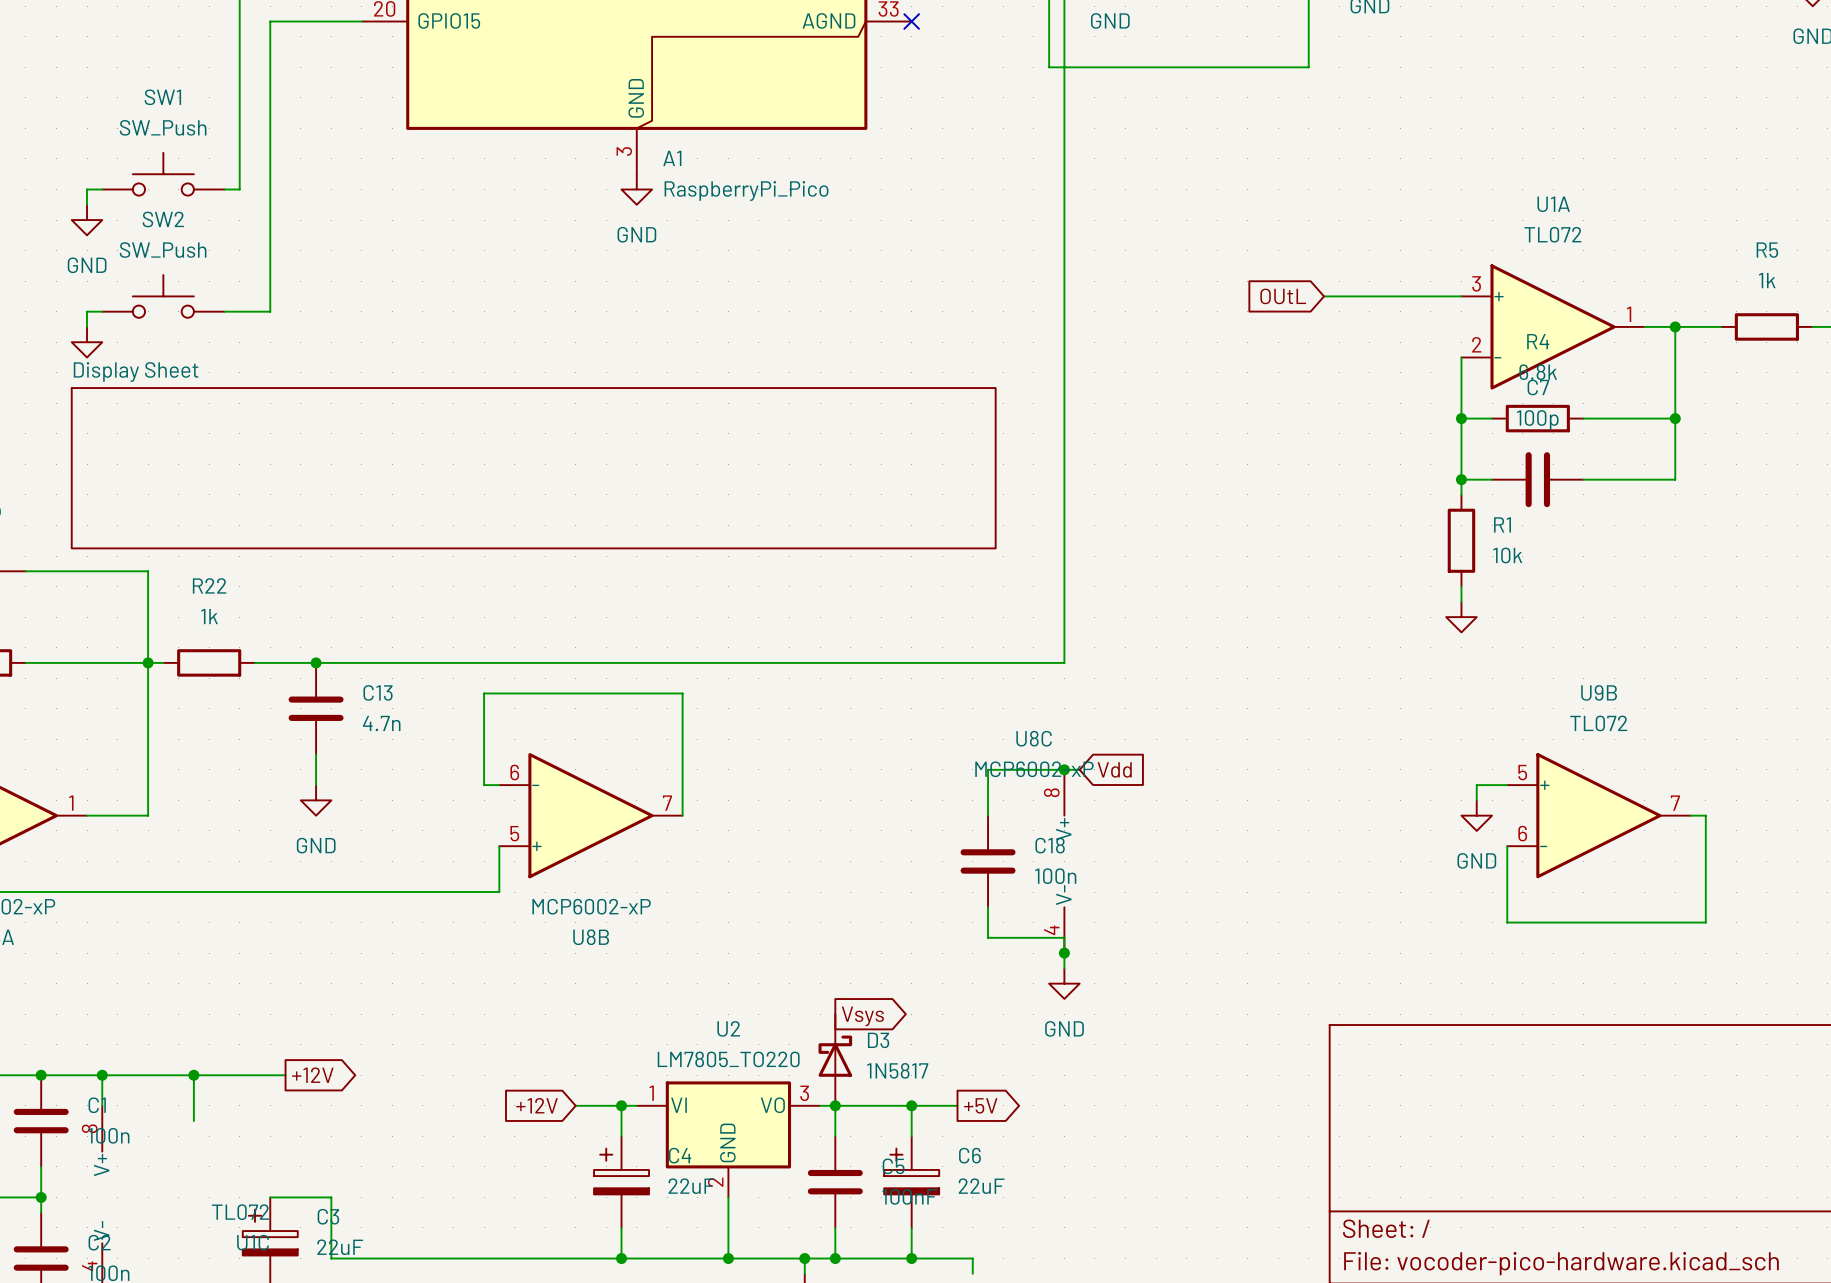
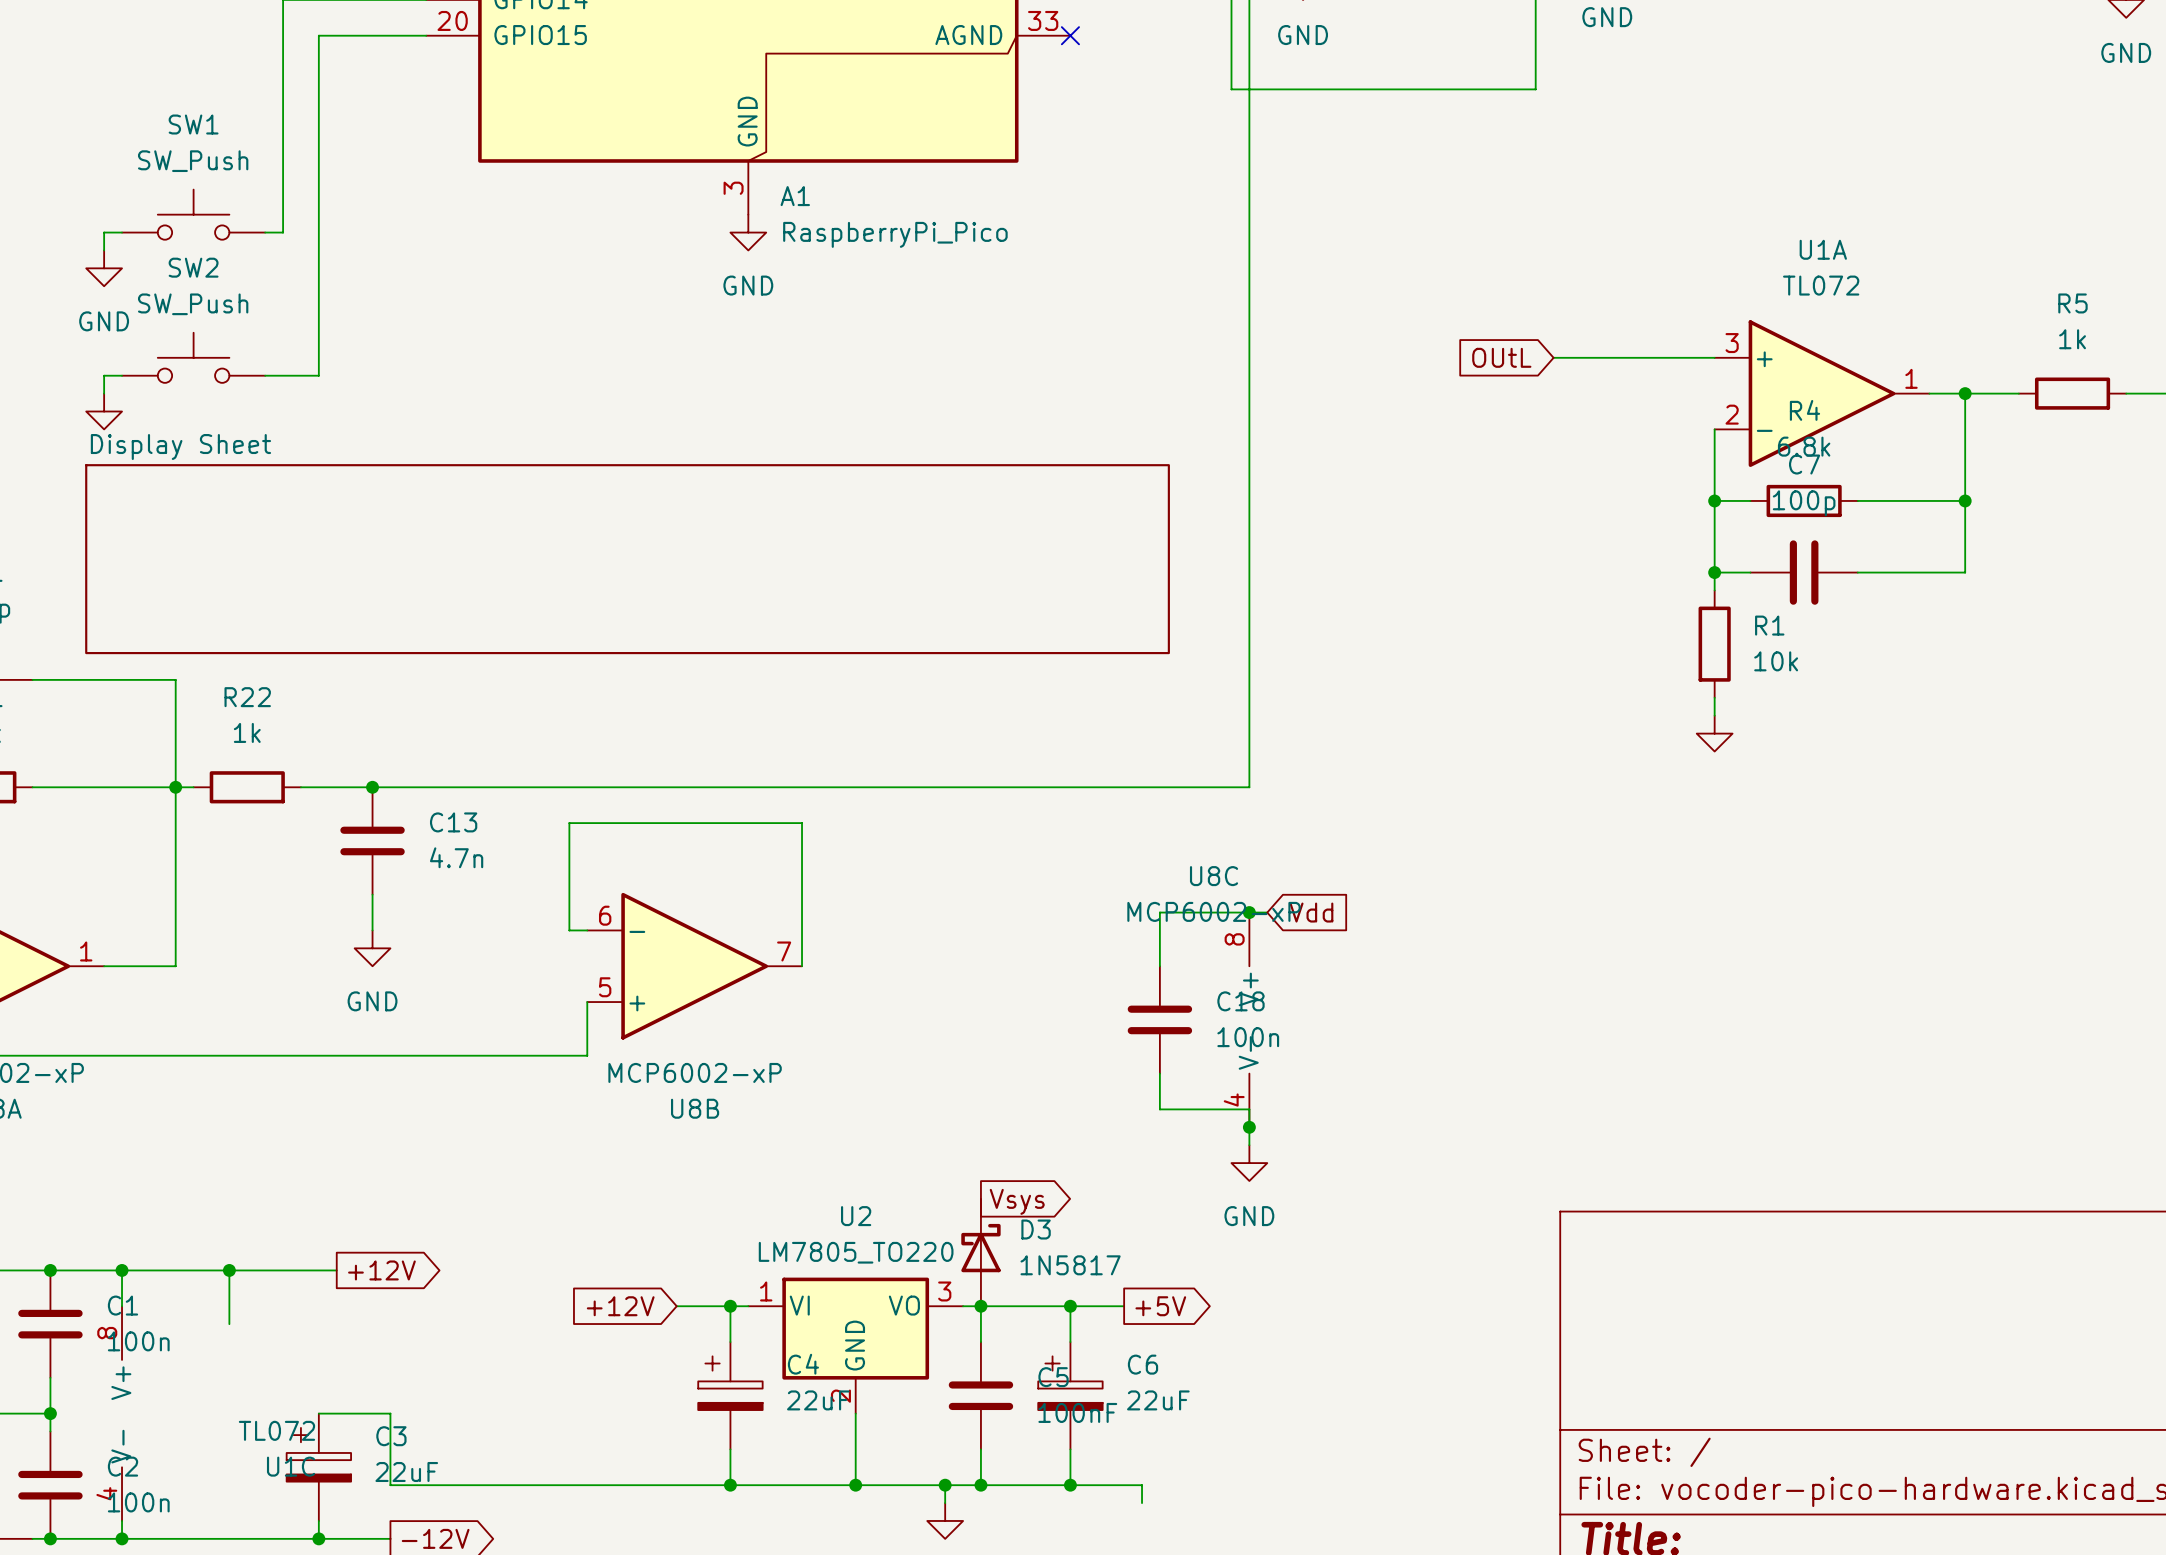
wire: (1507, 785) (1476, 785) (1476, 800) -> none
power symbol: GND (1476, 815) -> none
U9B: TL072 (1598, 815) -> none
wire: (1690, 815) (1705, 815) (1705, 922) (1507, 922) (1507, 846) -> none

